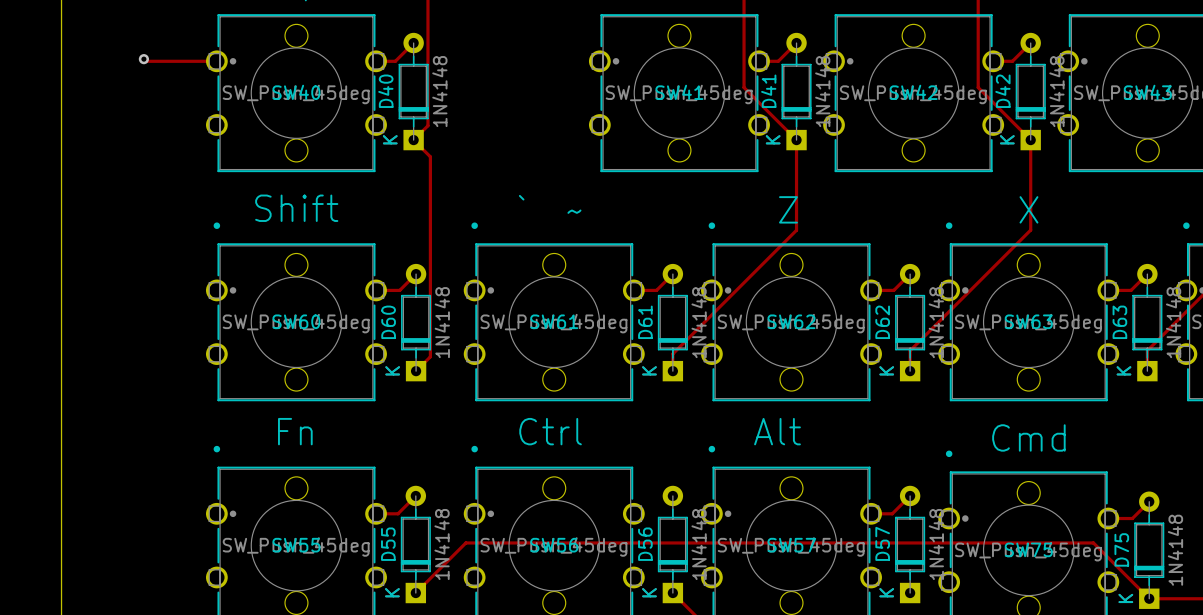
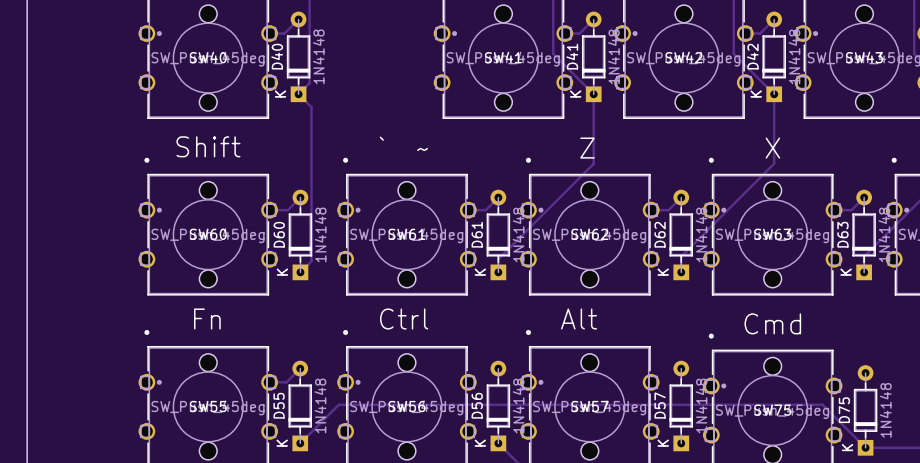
track: (143, 59) (146, 61) (216, 61) -> none
via: (143, 59) -> none
track: (910, 495) (892, 513) (871, 513) -> none
track: (1149, 501) (1132, 518) (1108, 518) -> none

